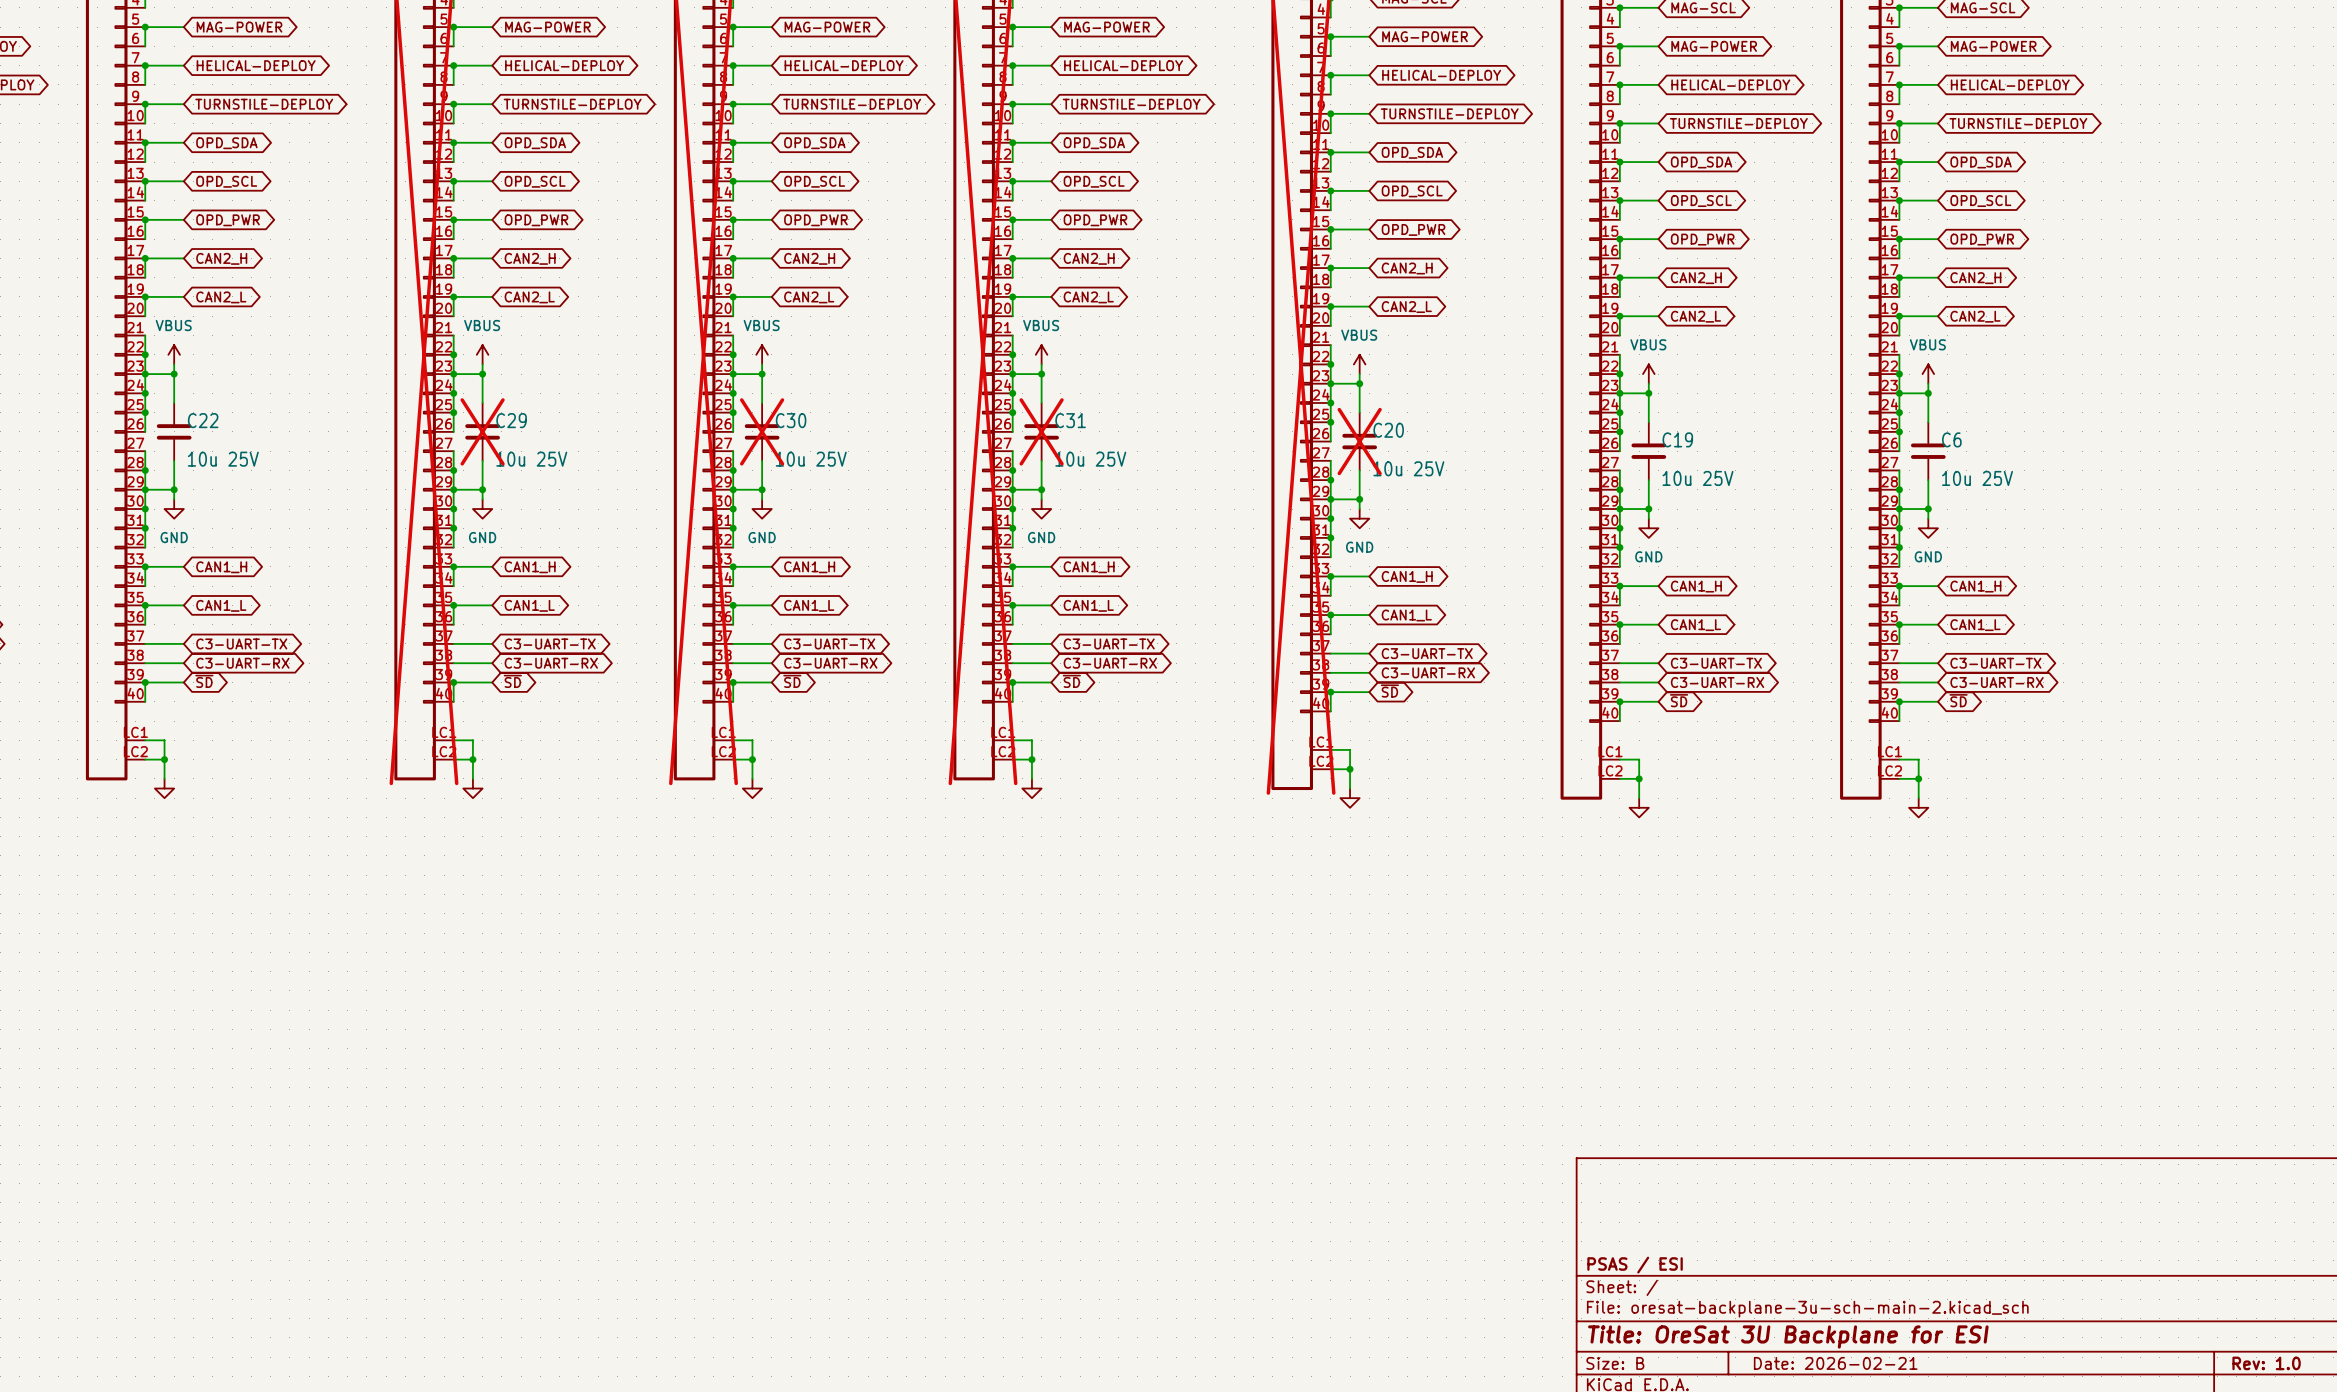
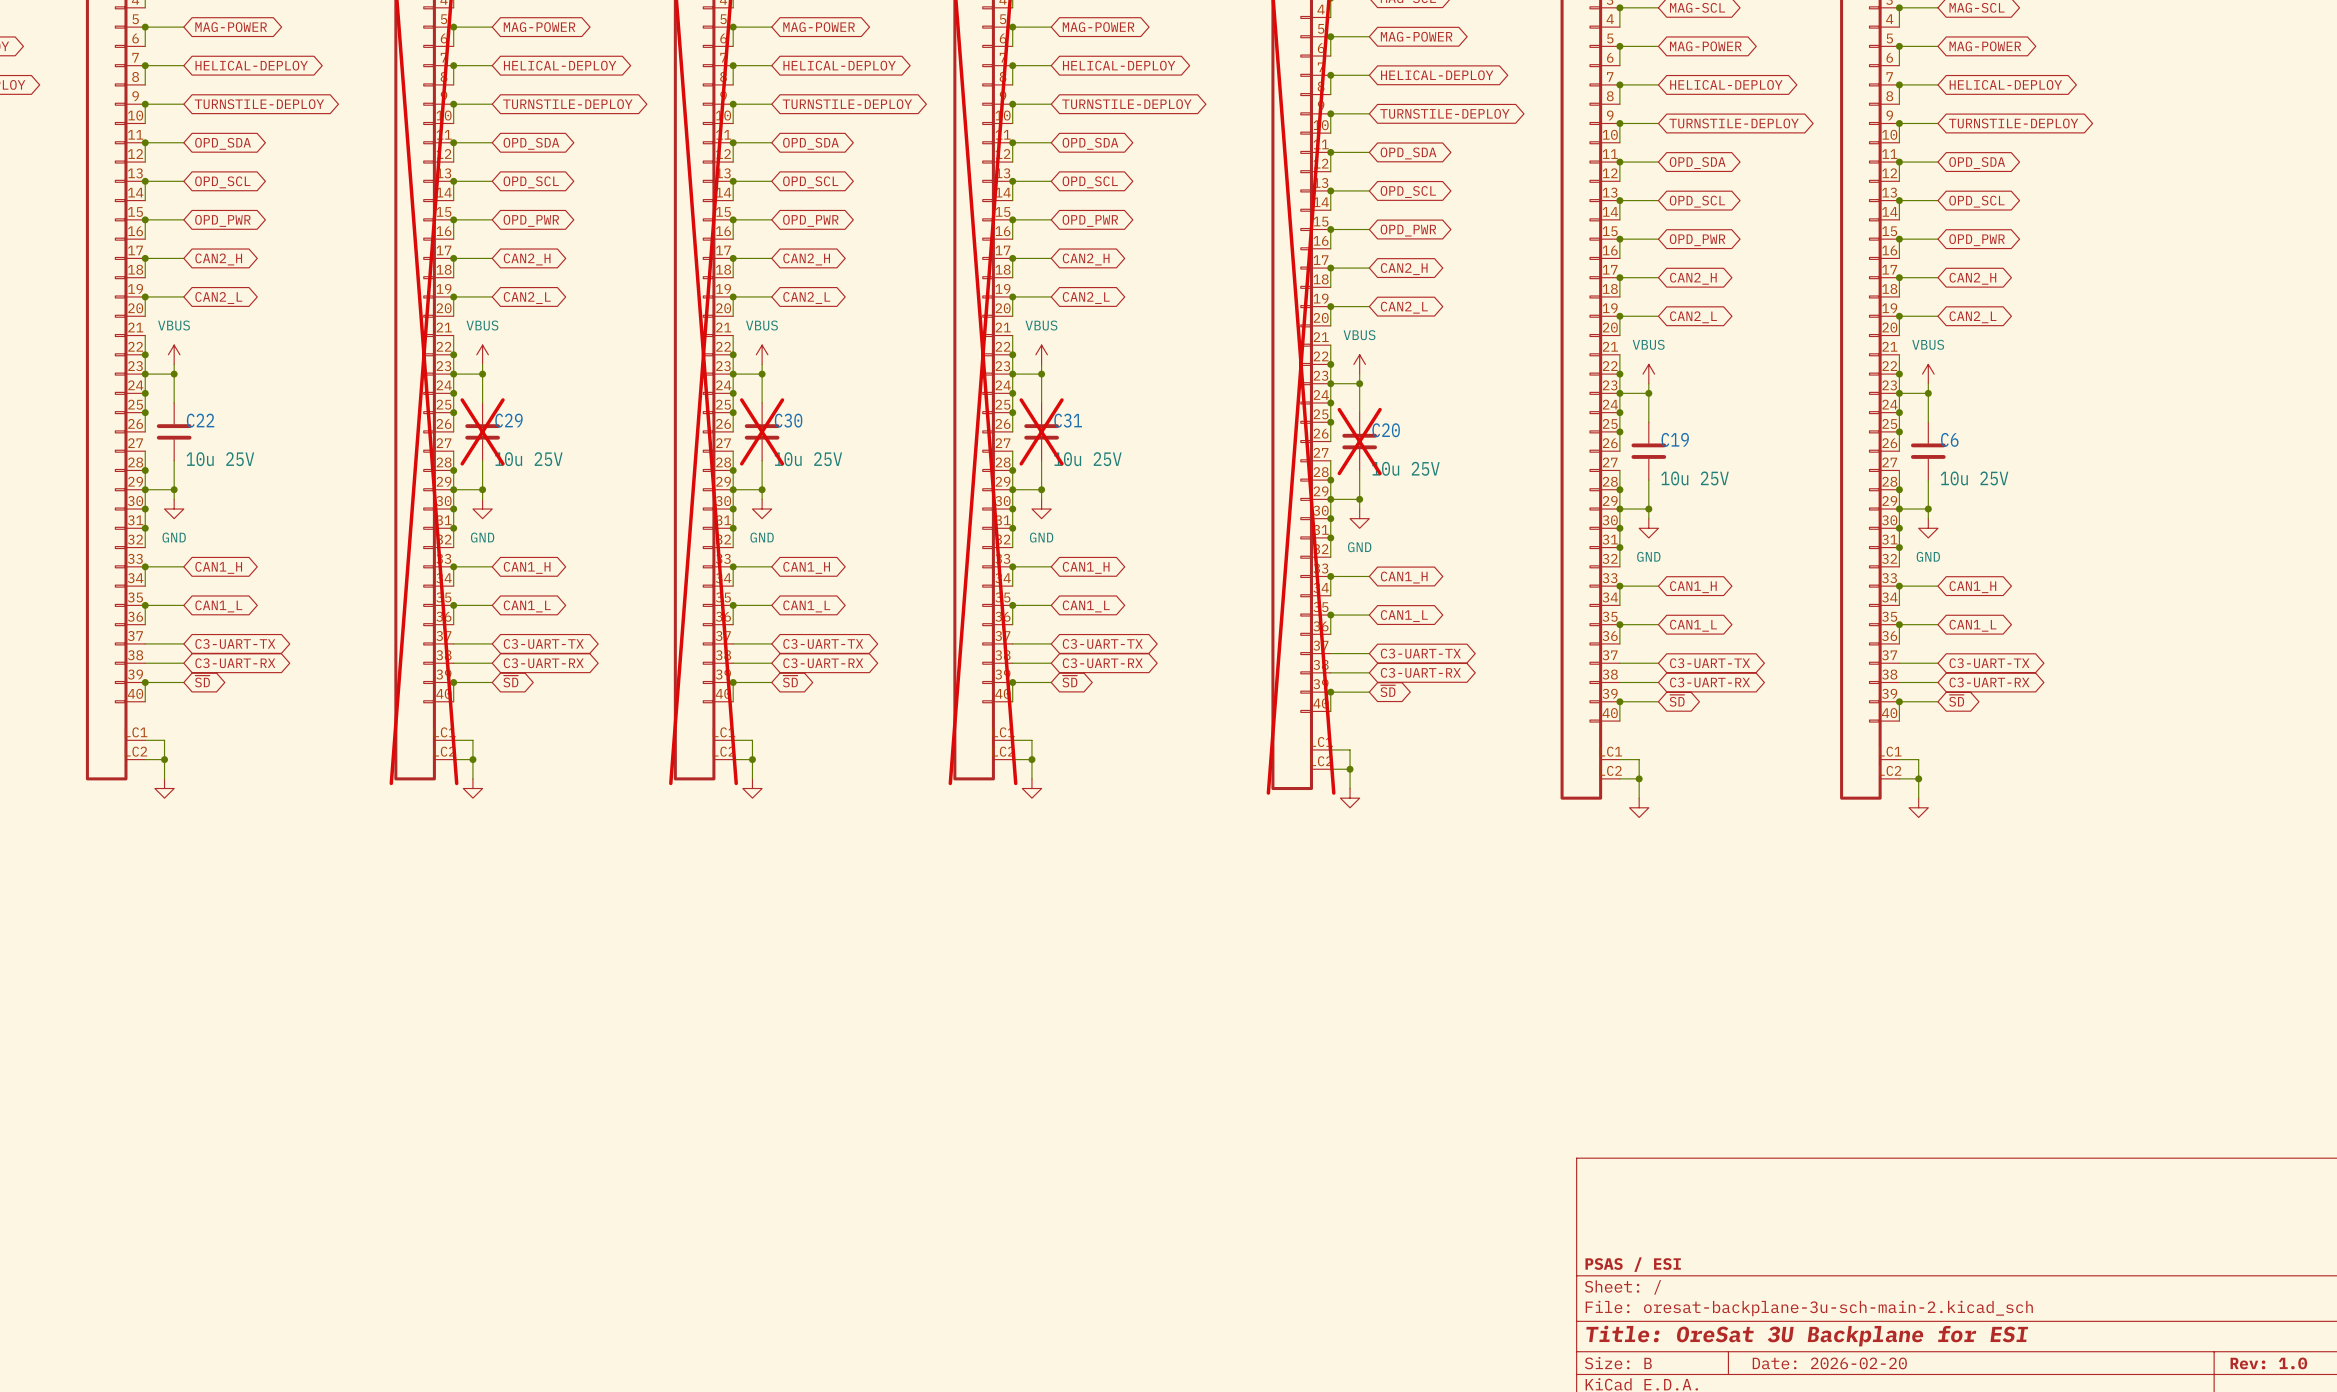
title block: Date: 2026-02-21 (1835, 1363) -> Date: 2026-02-20 (1829, 1363)

